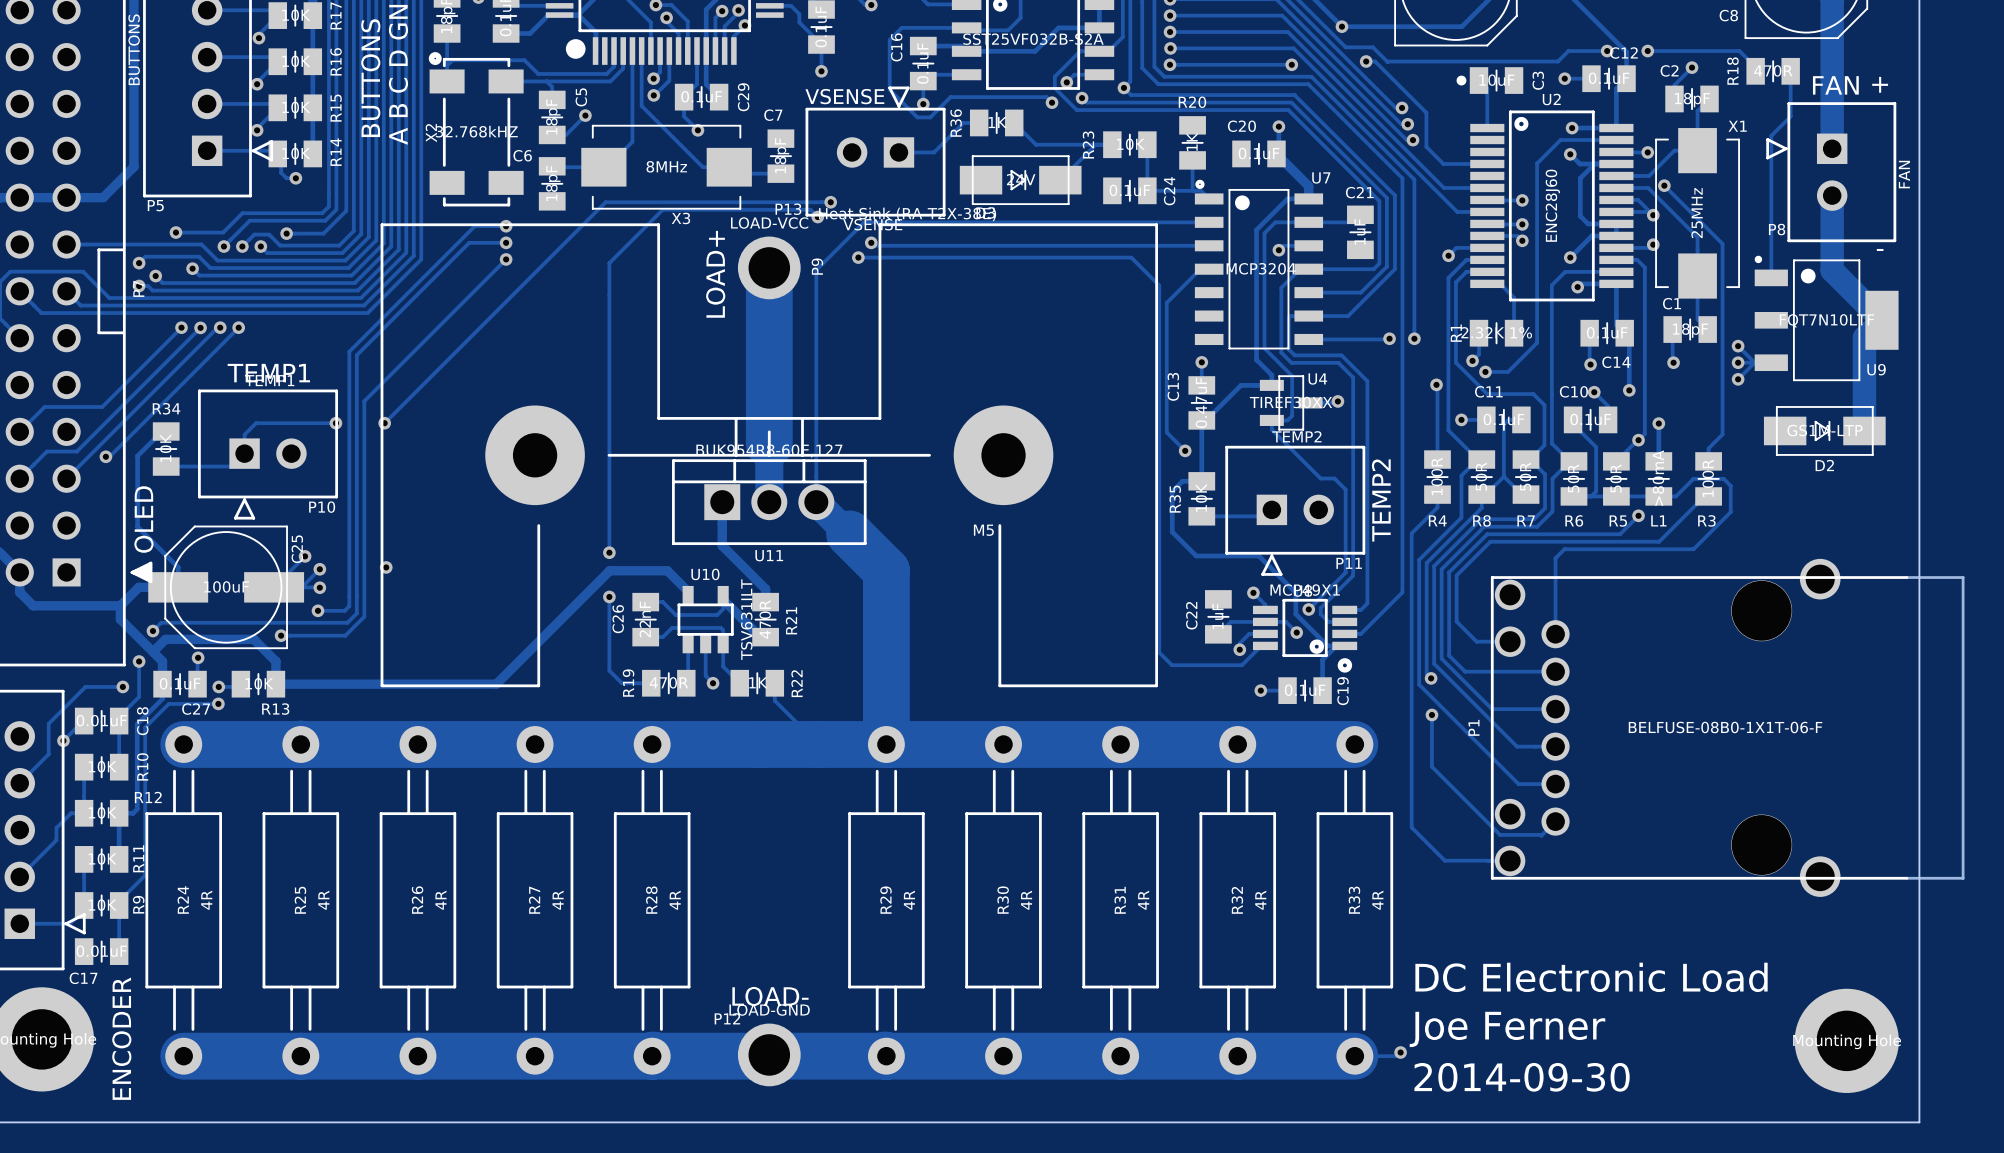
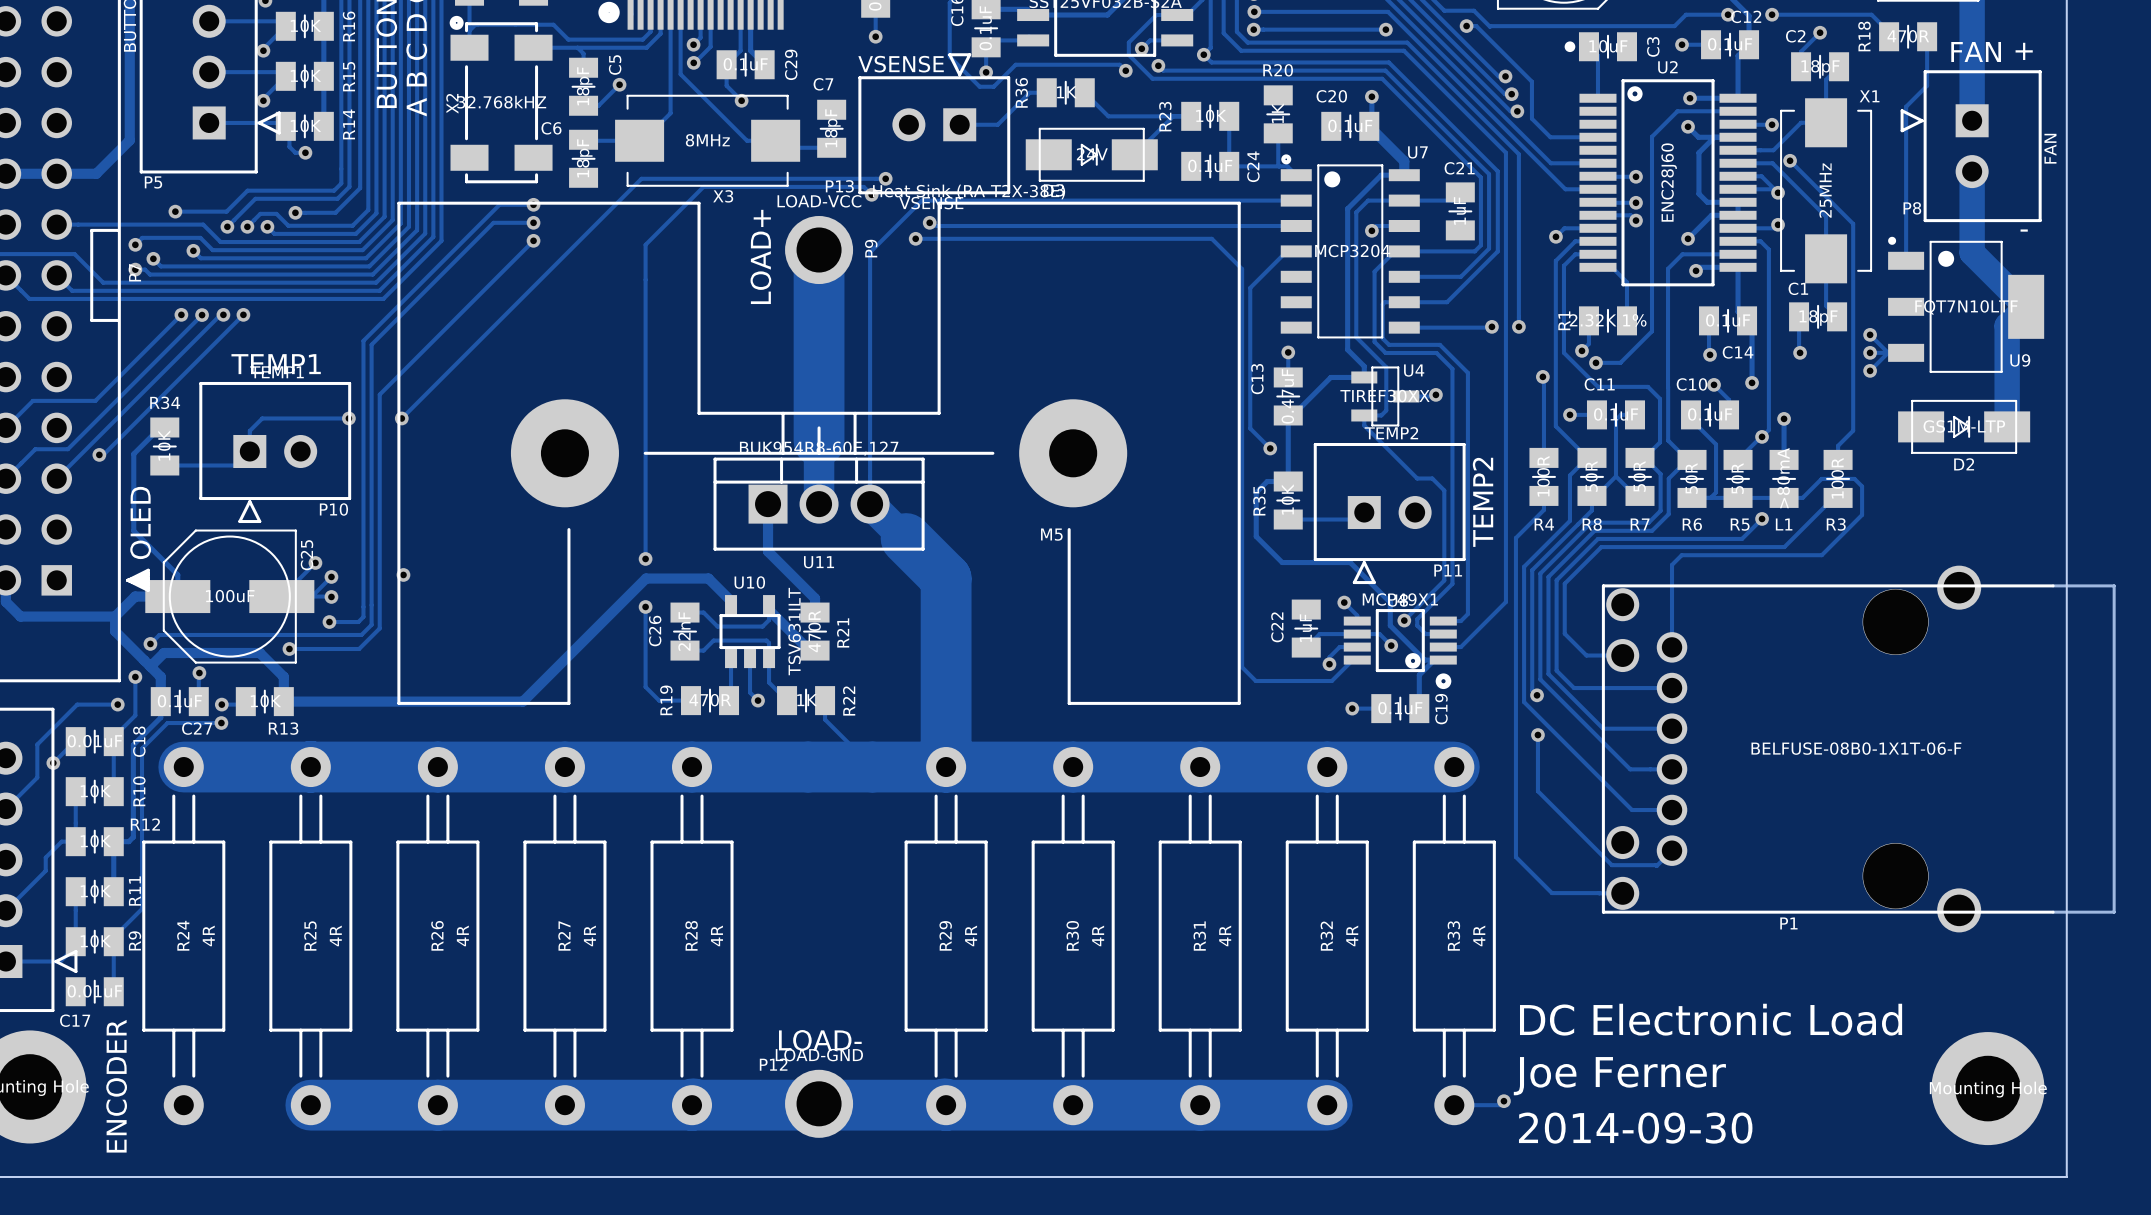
P1 name rotation: 0° (1473, 727) -> 90° clockwise (1788, 923)
P1 name position: P1 (1473, 727) -> P1 (1788, 923)
track: (183, 1056) (300, 1056) -> none
track: (1237, 1056) (1354, 1056) -> none

